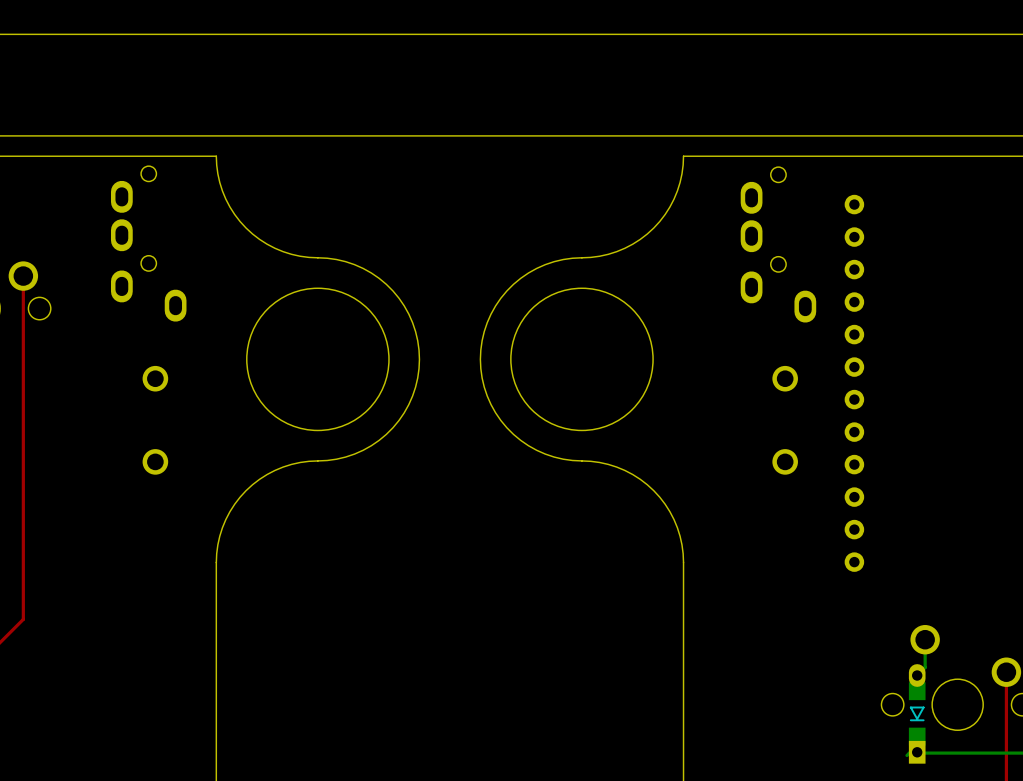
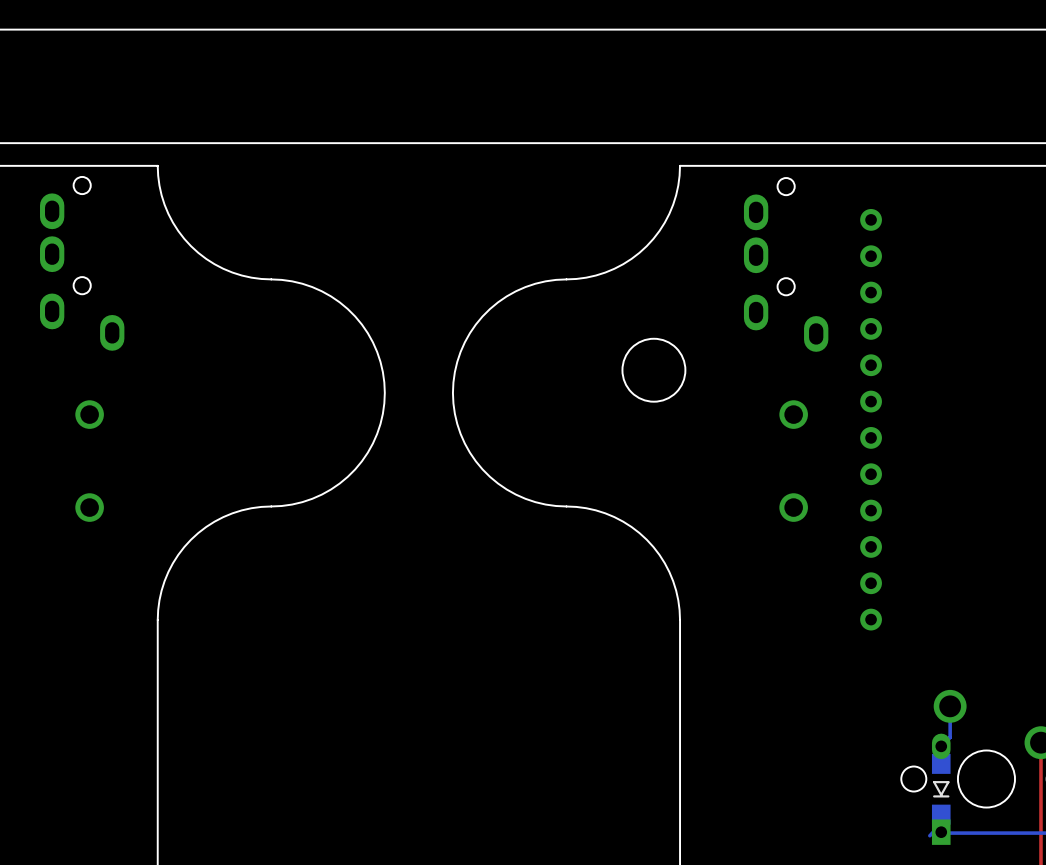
round board edge: [246, 287, 390, 432] -> none
round board edge: [510, 287, 654, 432] -> none
round board edge: none -> [621, 338, 687, 403]

